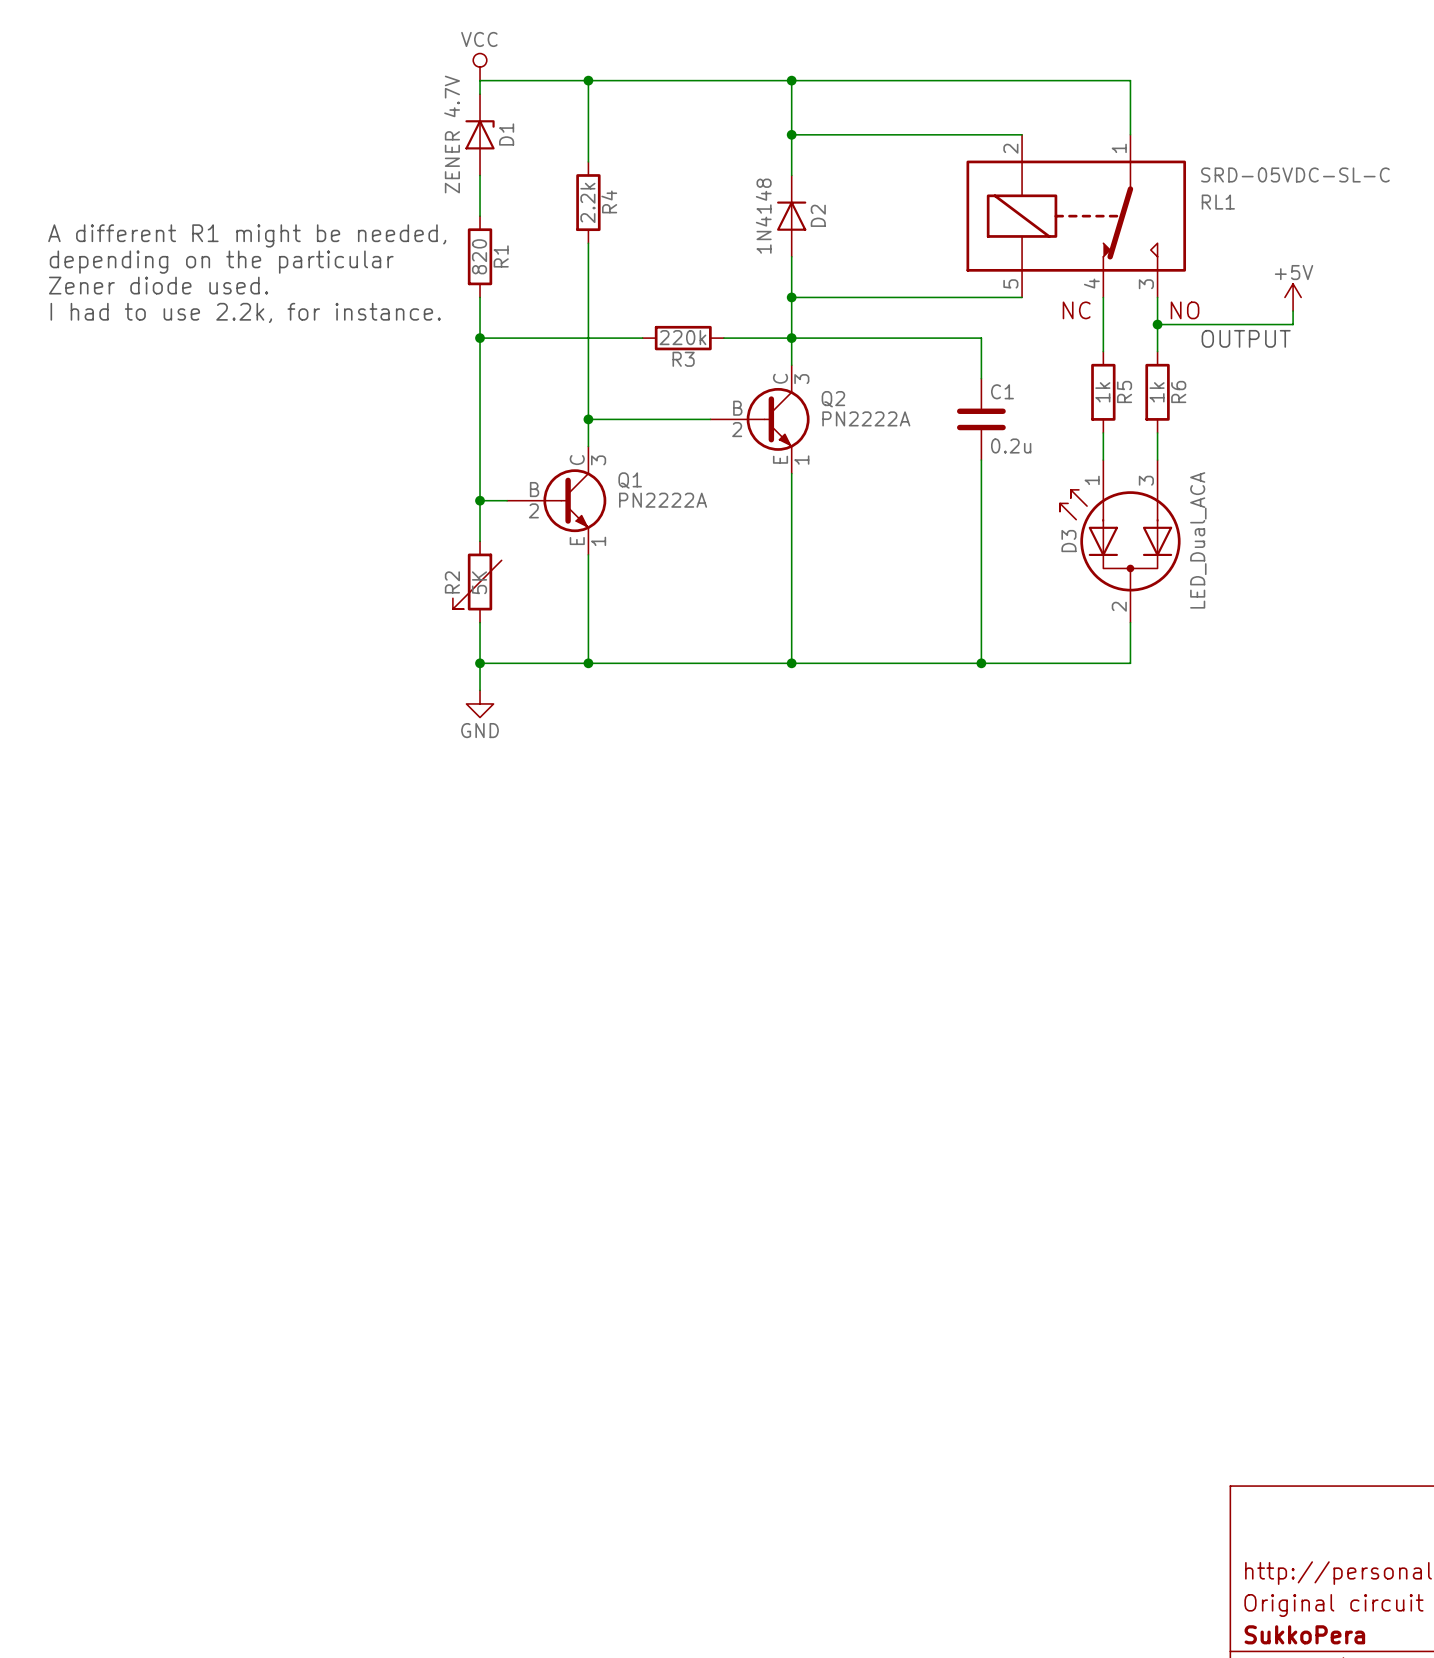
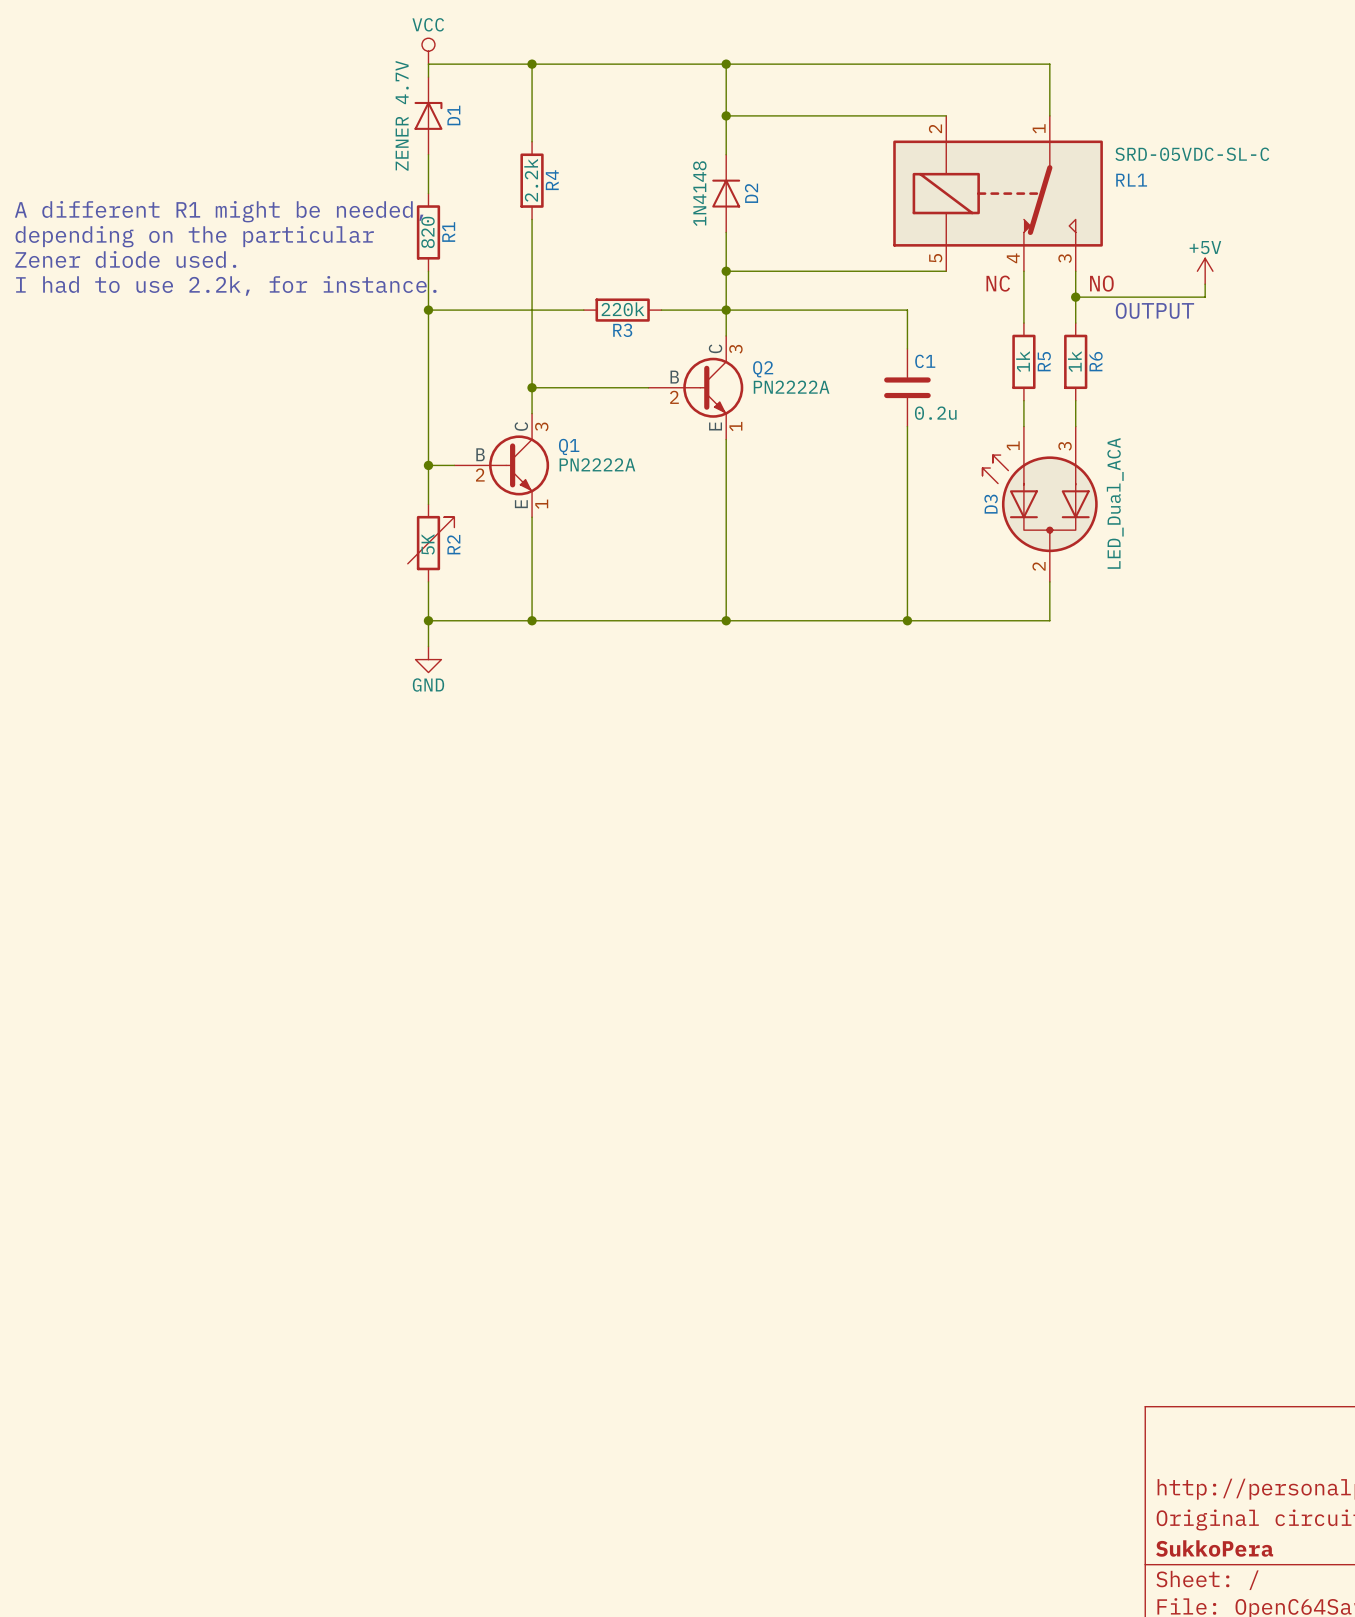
R2 rotation: 0° (477, 582) -> 180° (431, 543)

